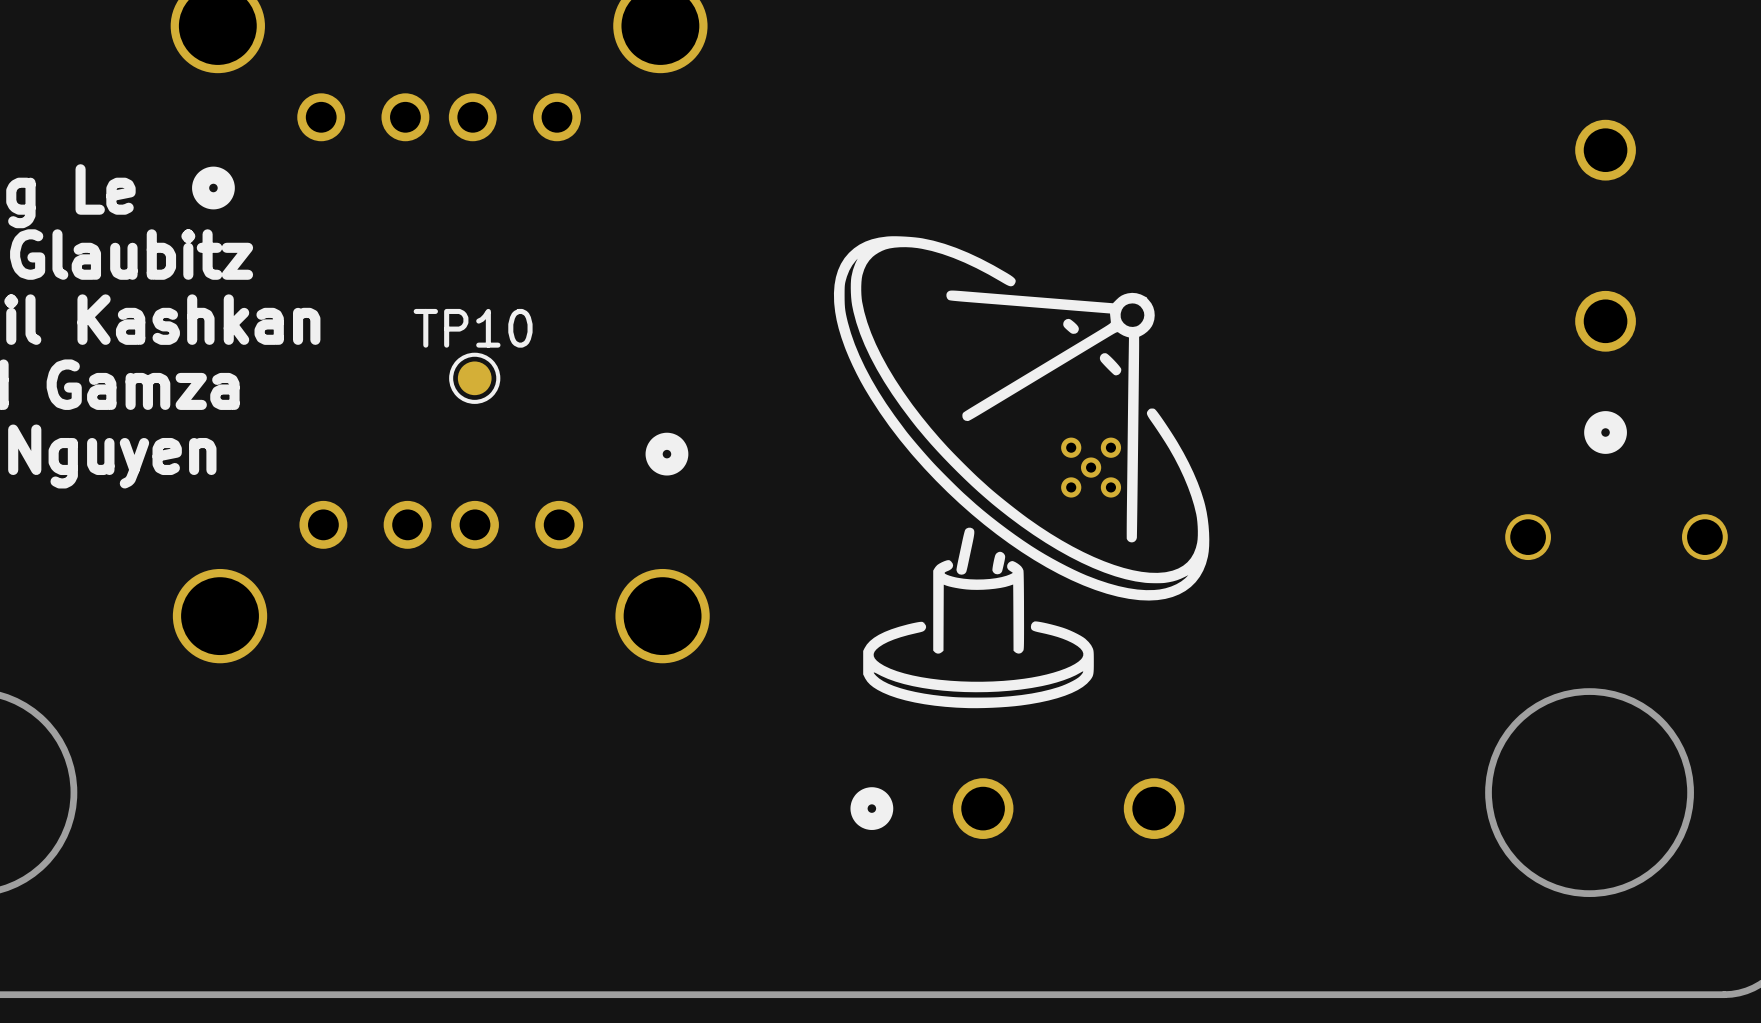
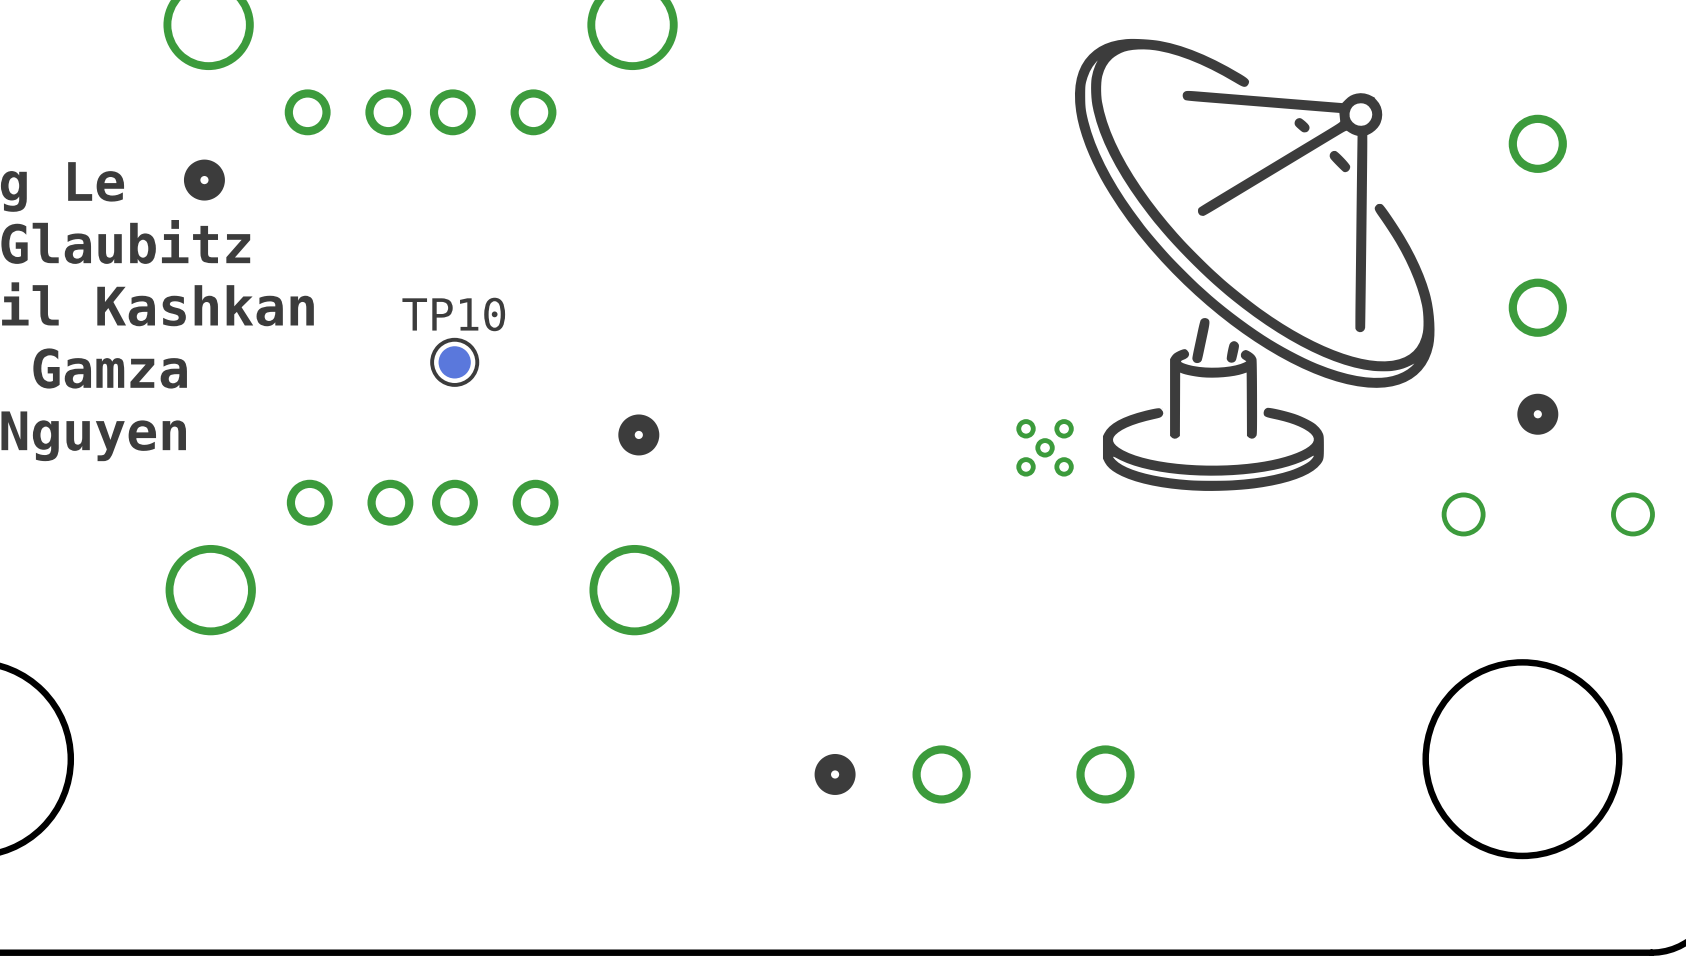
drawing position: (1021, 472) -> (1254, 264)

